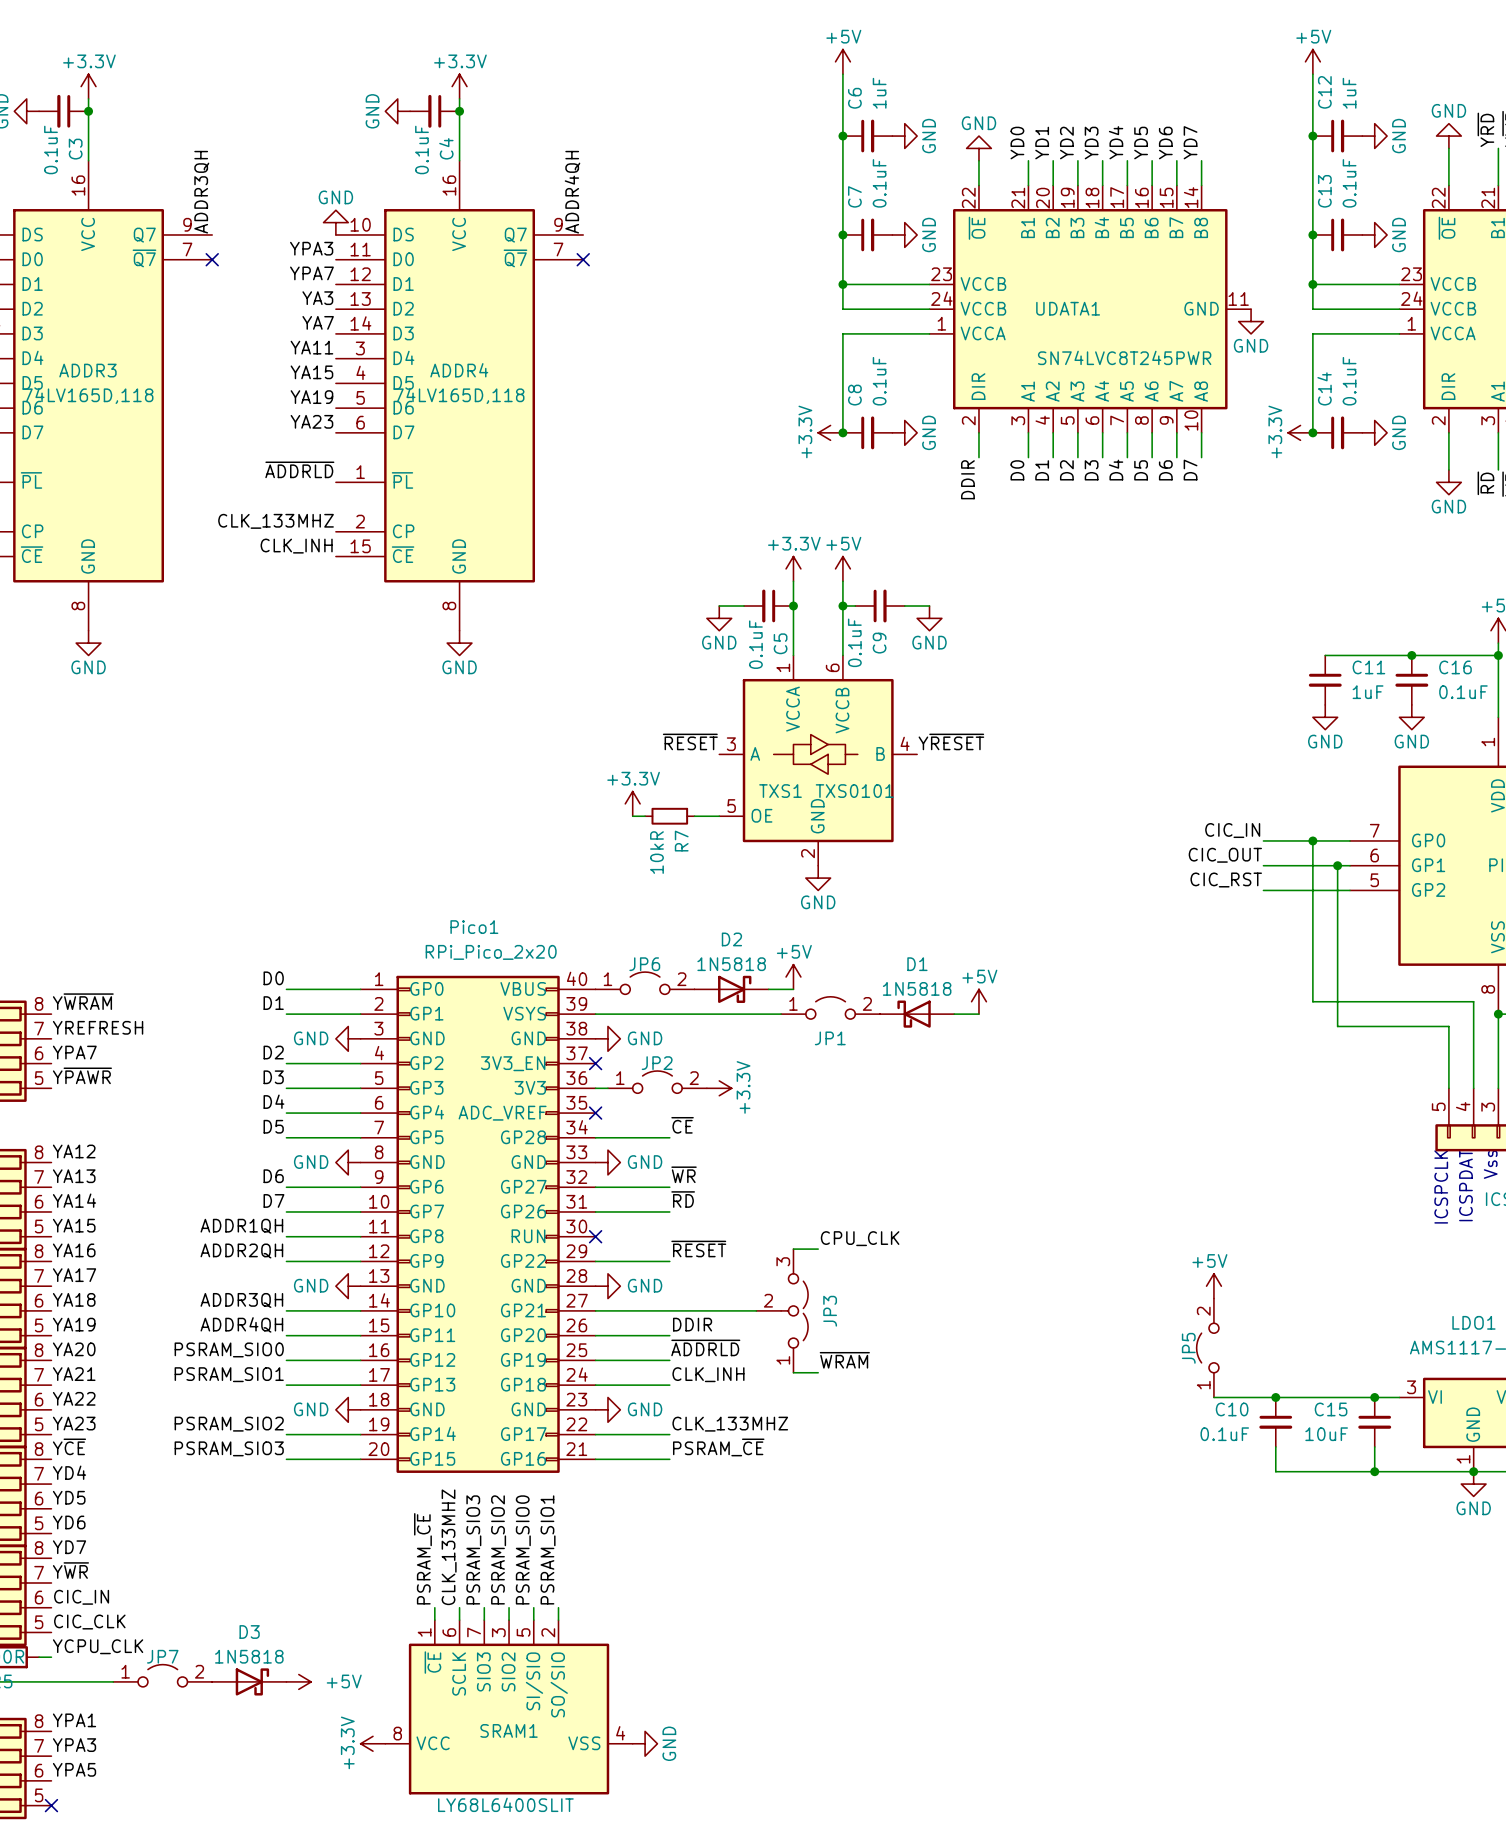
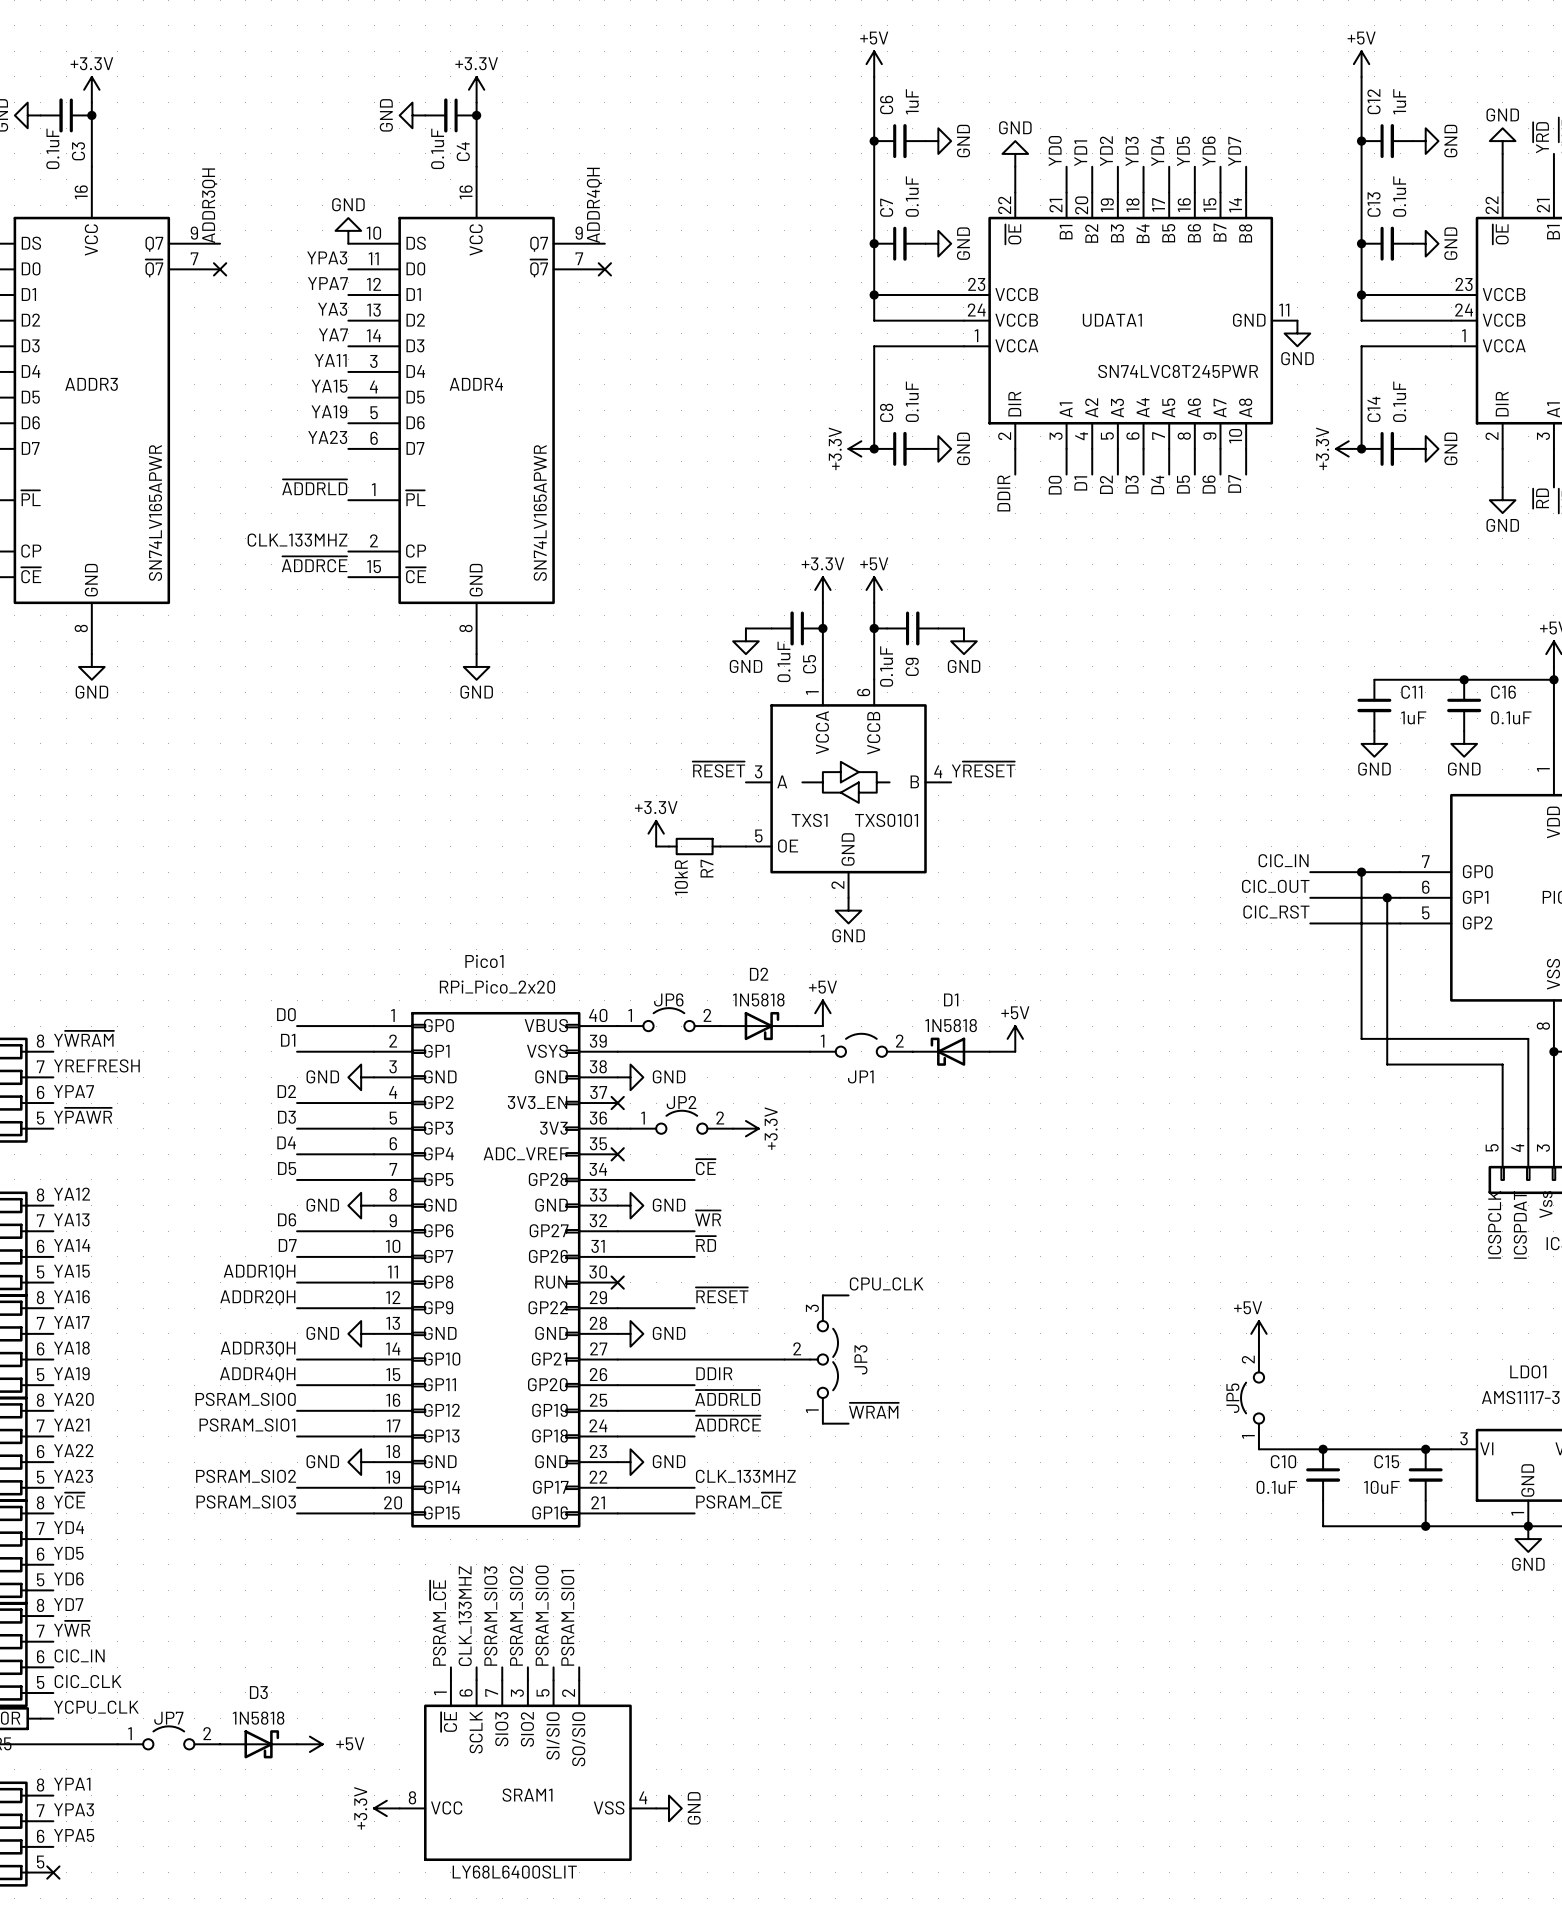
ADDR3 value: 74LV165D,118 (88, 395) -> SN74LV165APWR (155, 513)
ADDR4 value: 74LV165D,118 (459, 395) -> SN74LV165APWR (540, 513)
label: CLK_INH (296, 546) -> ~{ADDRCE} (314, 564)
label: CLK_INH (708, 1374) -> ~{ADDRCE} (728, 1423)

